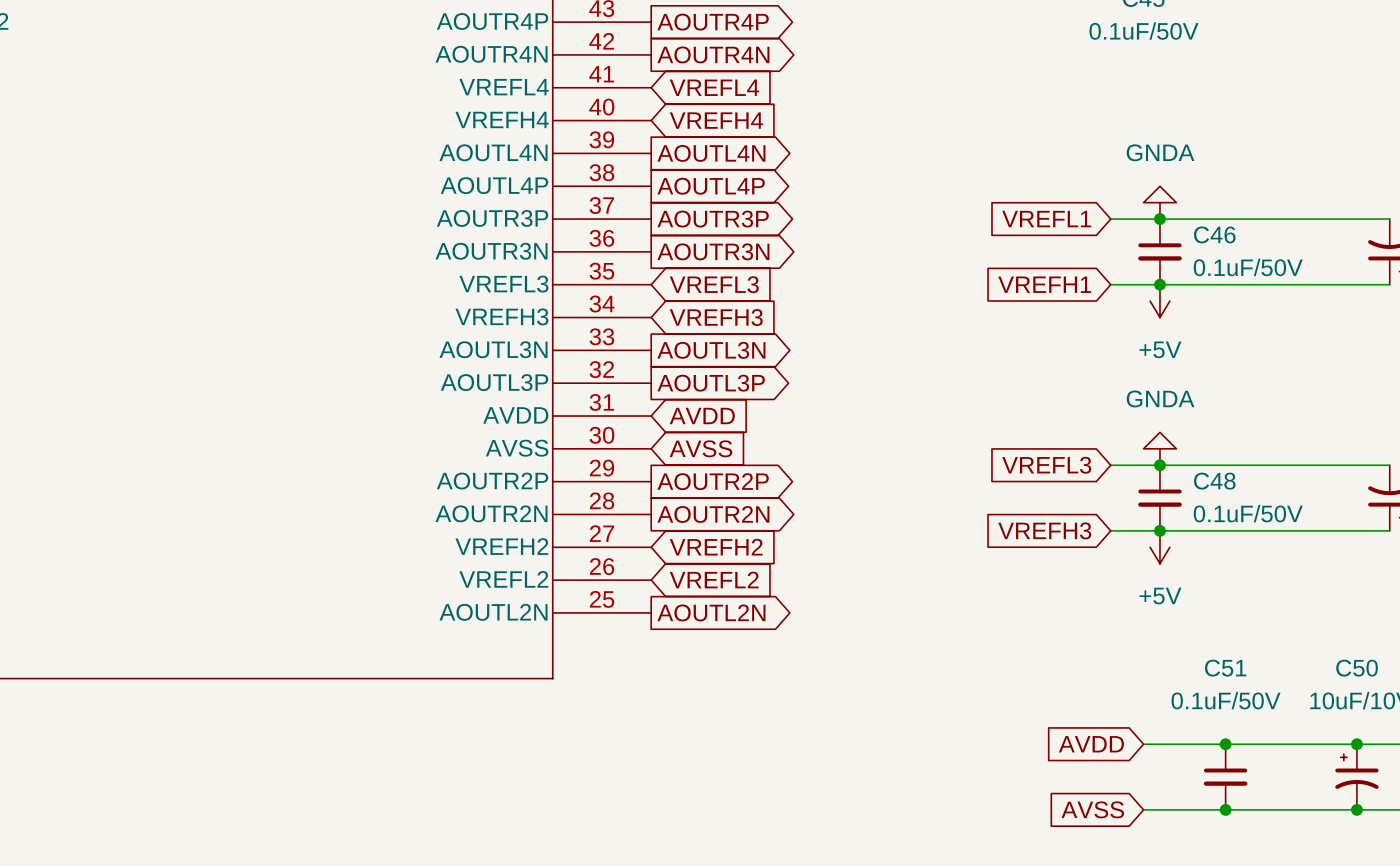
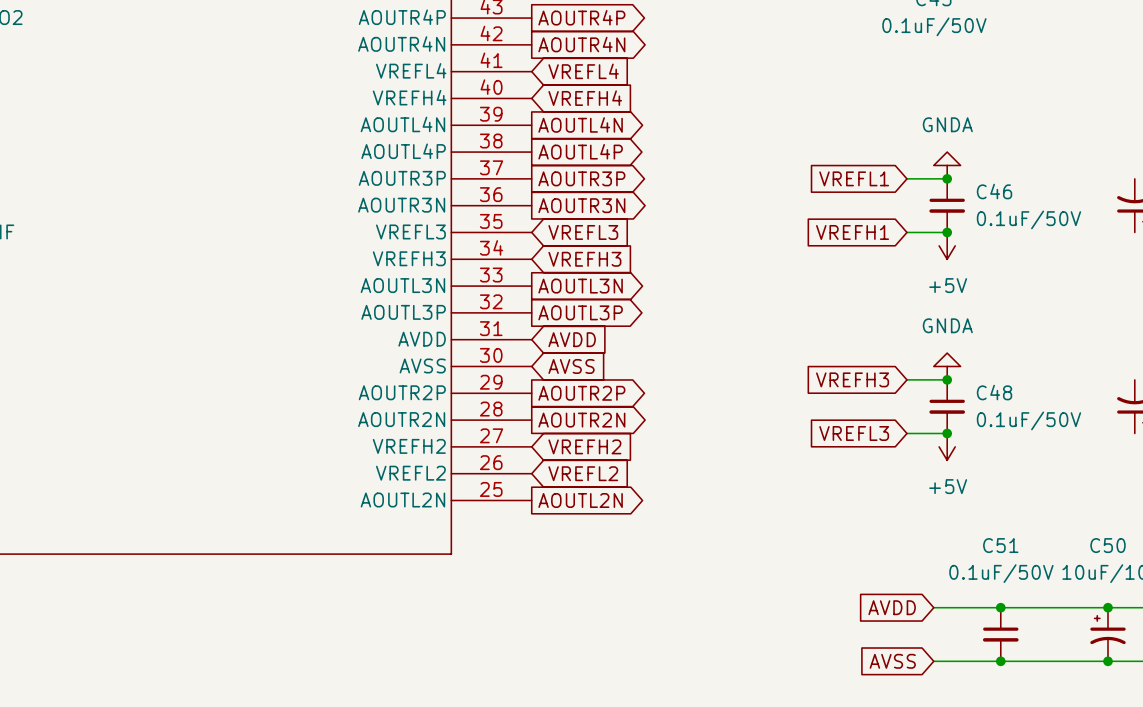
wire: (1159, 219) (1389, 219) -> none
wire: (1159, 284) (1389, 284) -> none
global label: VREFL3 (1046, 465) -> VREFH3 (852, 379)
wire: (1159, 465) (1389, 465) -> none
global label: VREFH3 (1044, 530) -> VREFL3 (854, 433)
wire: (1159, 530) (1389, 530) -> none

